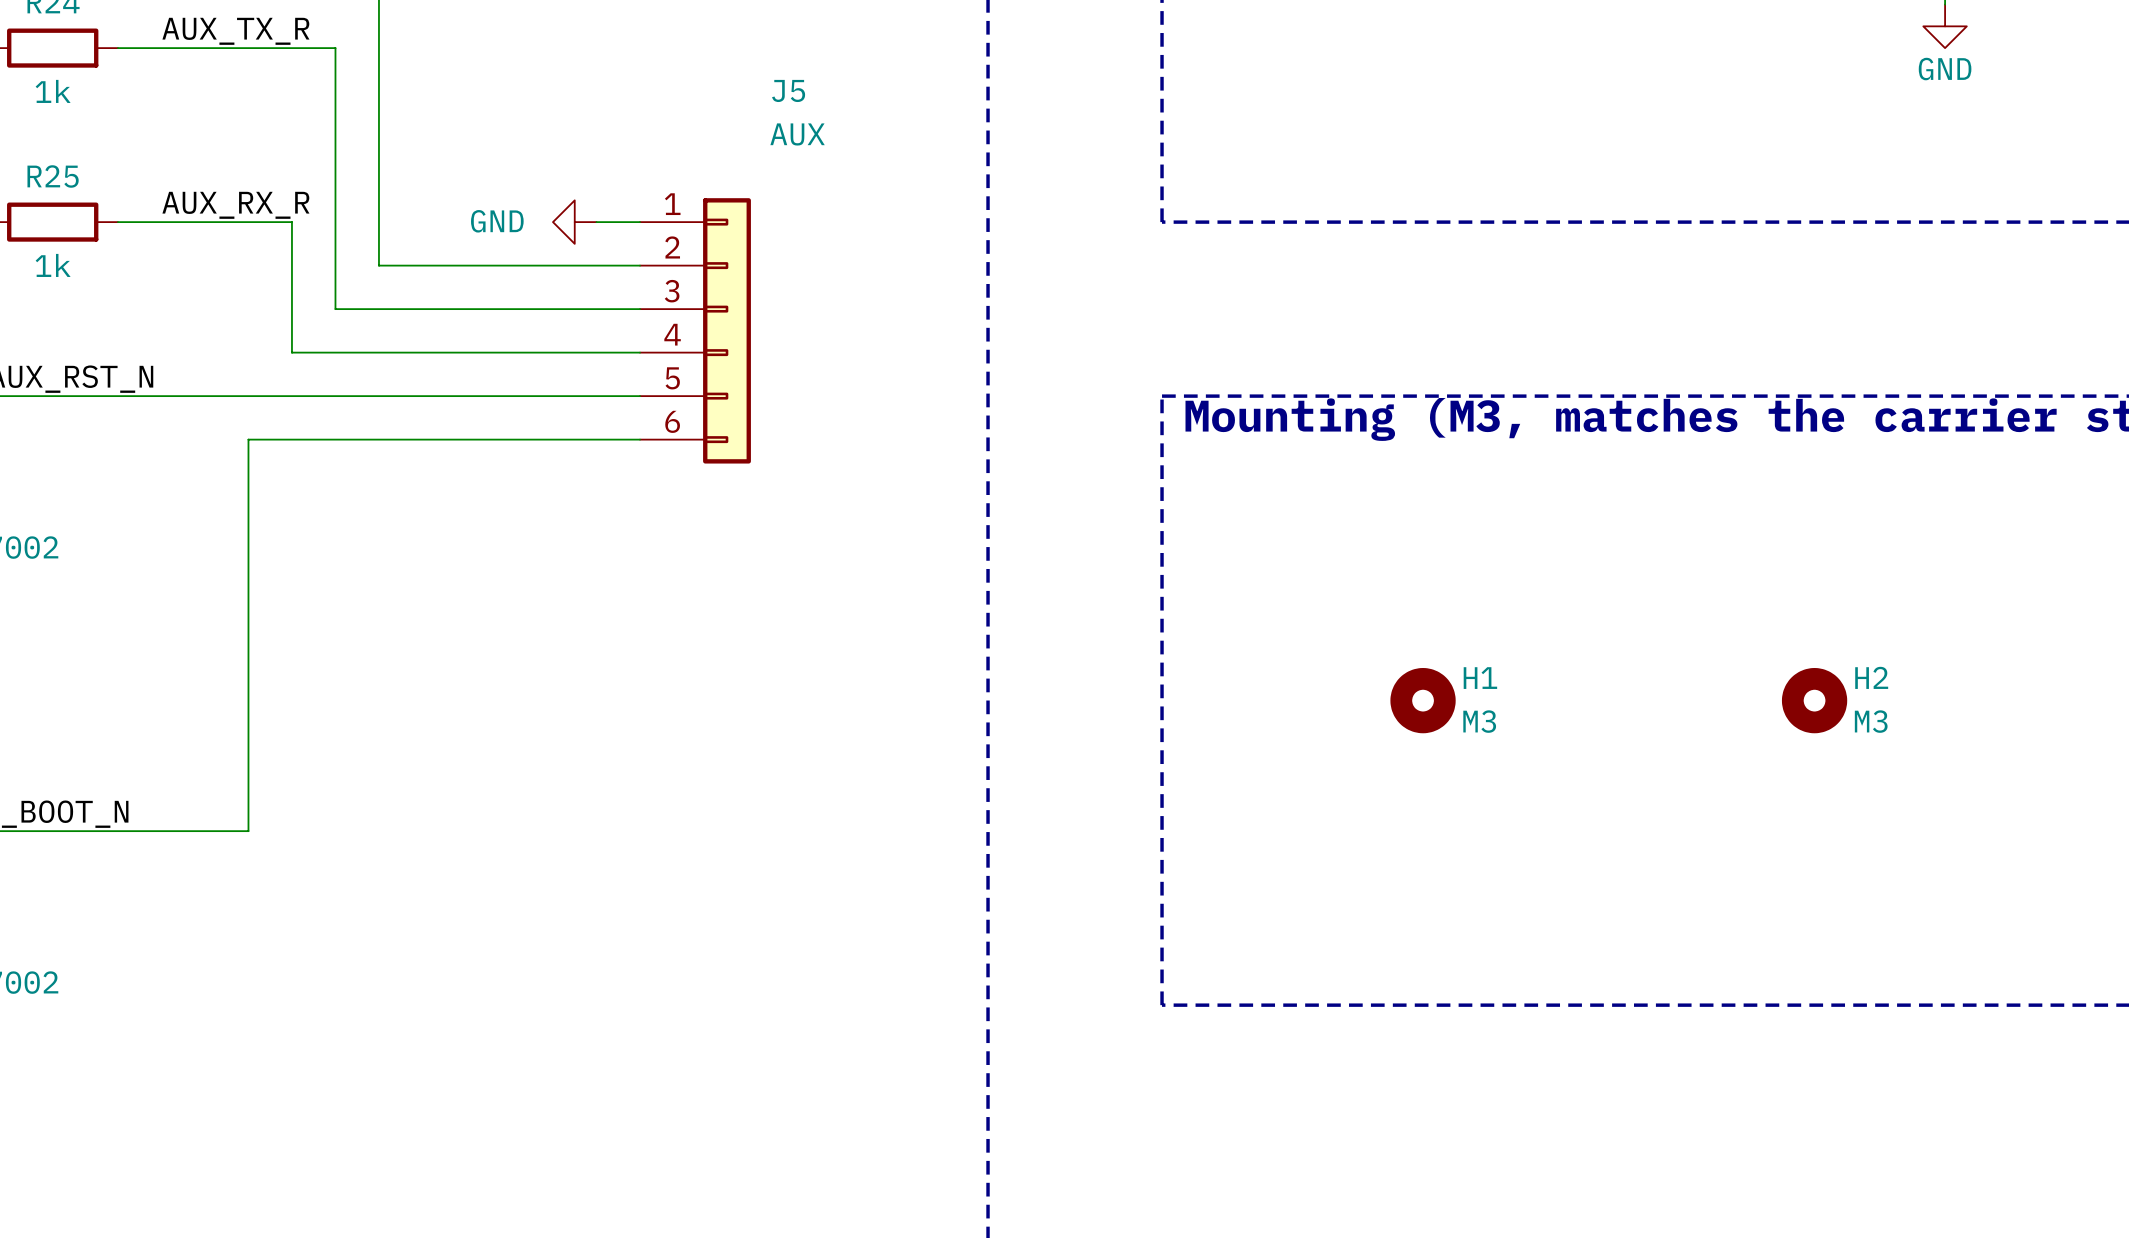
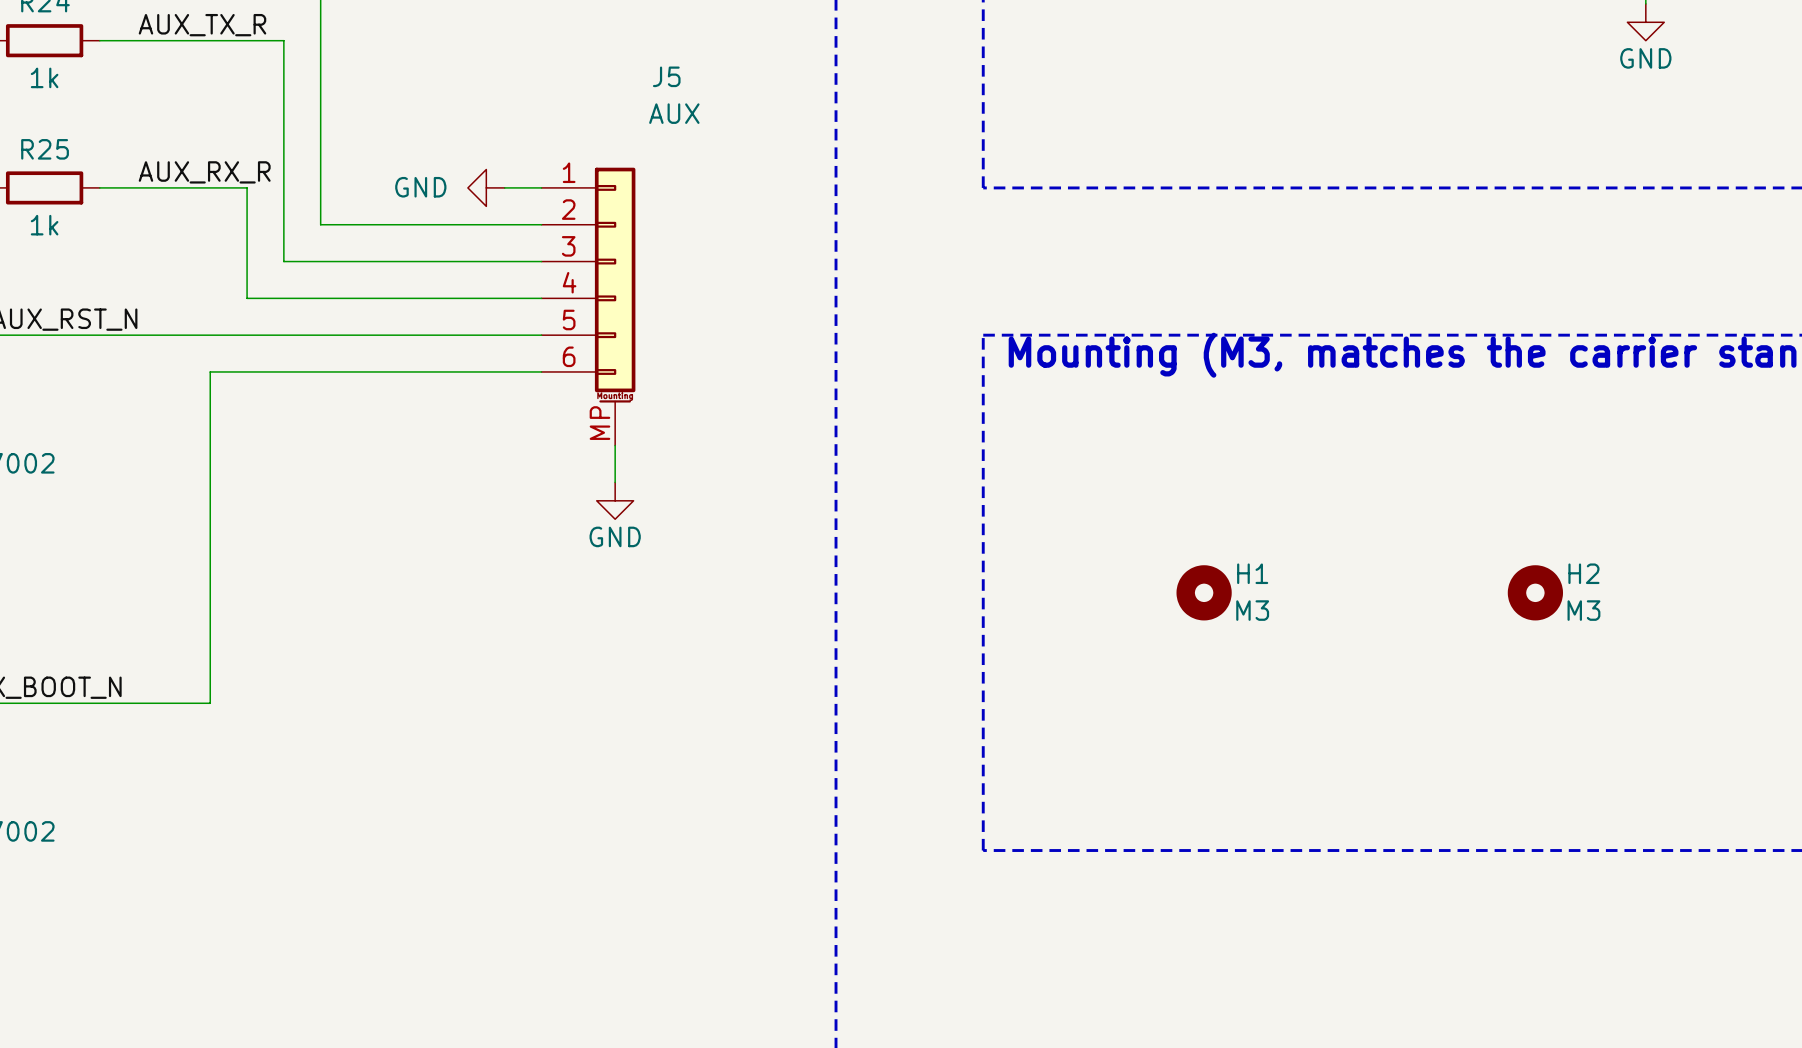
J5 symbol: [640, 198, 751, 464] -> [541, 167, 636, 446]
wire: none -> (615, 445) (615, 482)
power symbol: none -> GND (615, 500)

